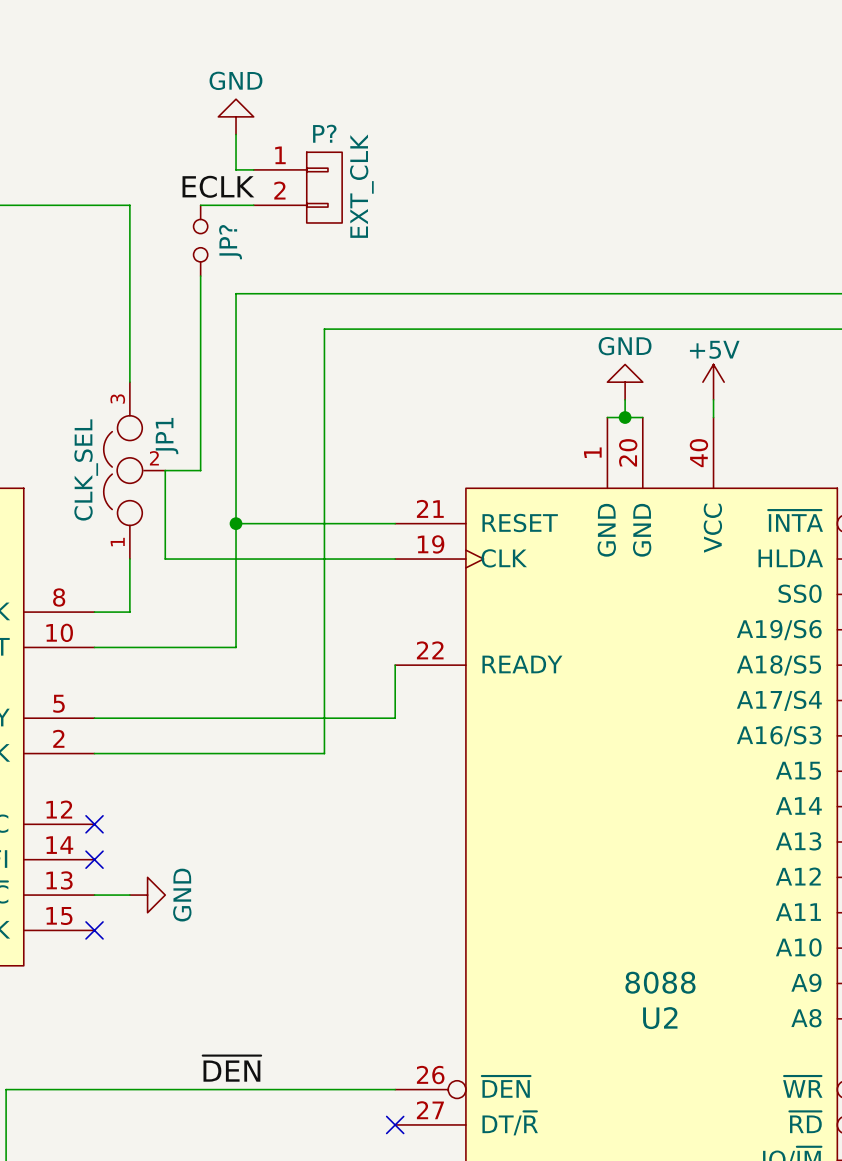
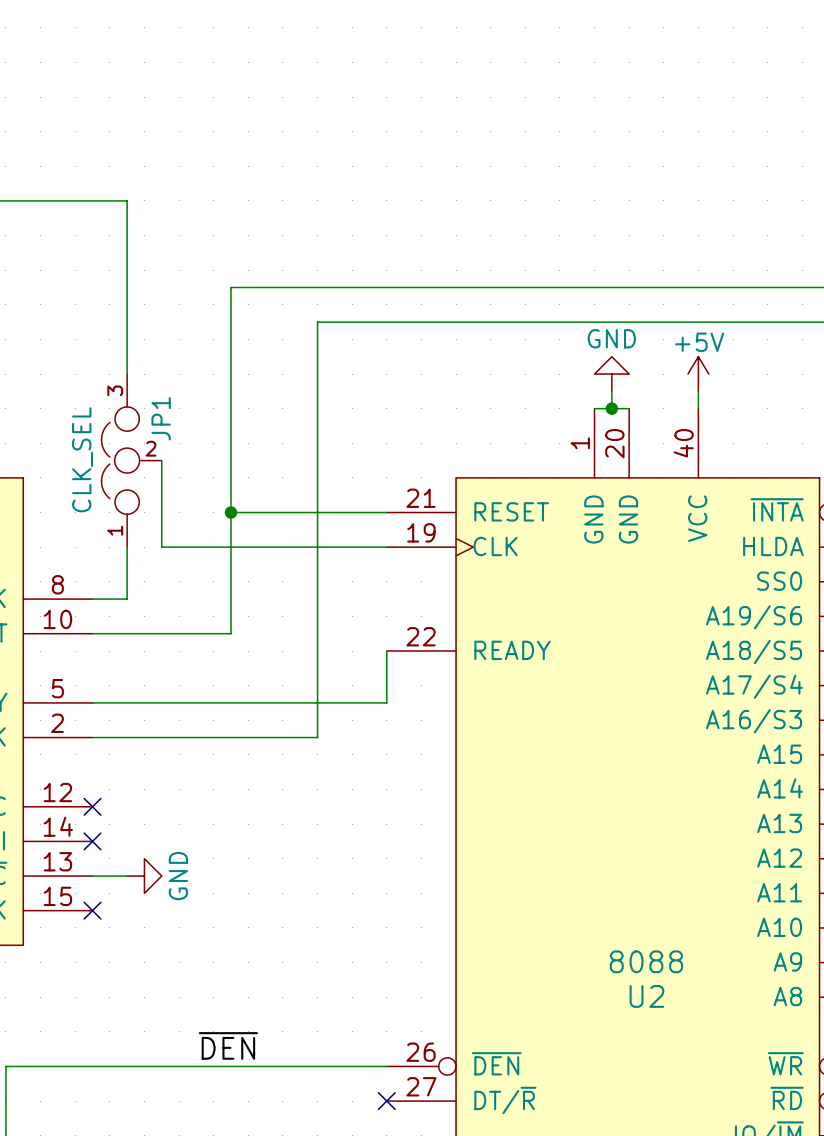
power symbol: GND (236, 116) -> none
wire: (236, 134) (236, 169) (253, 169) -> none
label: ECLK (218, 186) -> none
P?: EXT_CLK (297, 187) -> none
wire: (200, 205) (253, 205) -> none
JP?: (200, 240) -> none
wire: (200, 276) (200, 470) (165, 470) -> none

